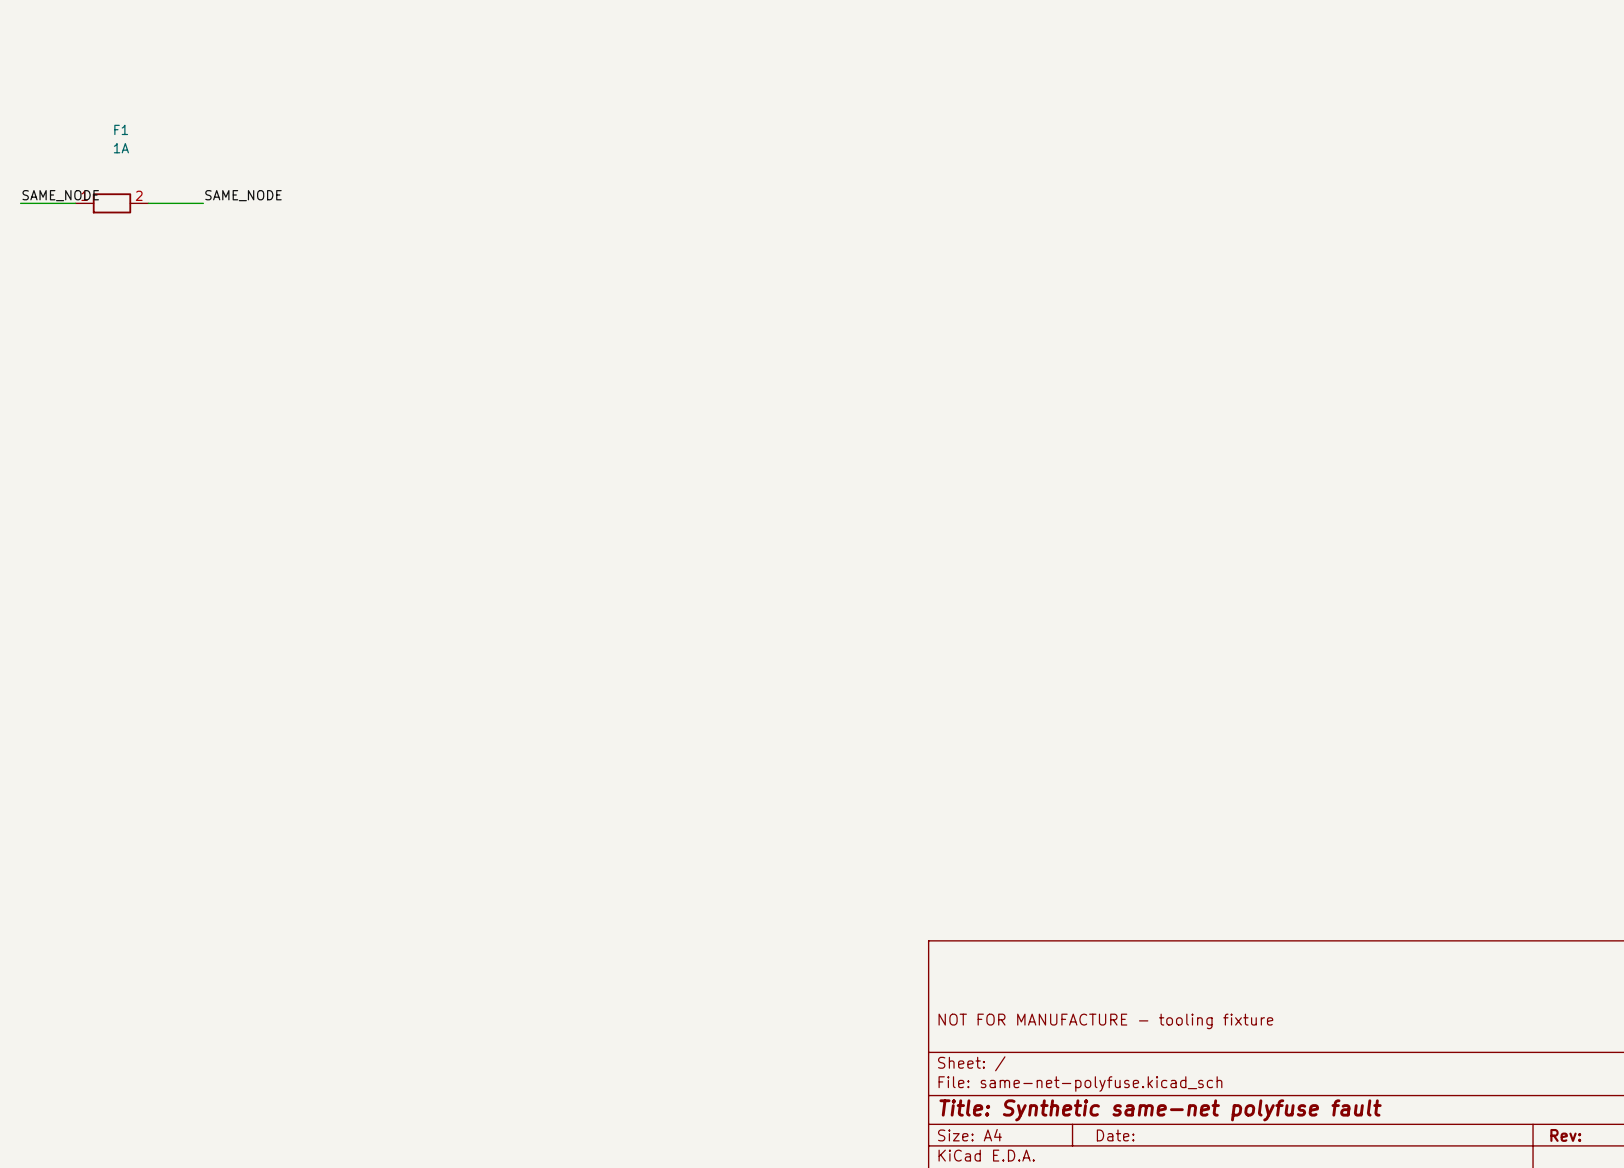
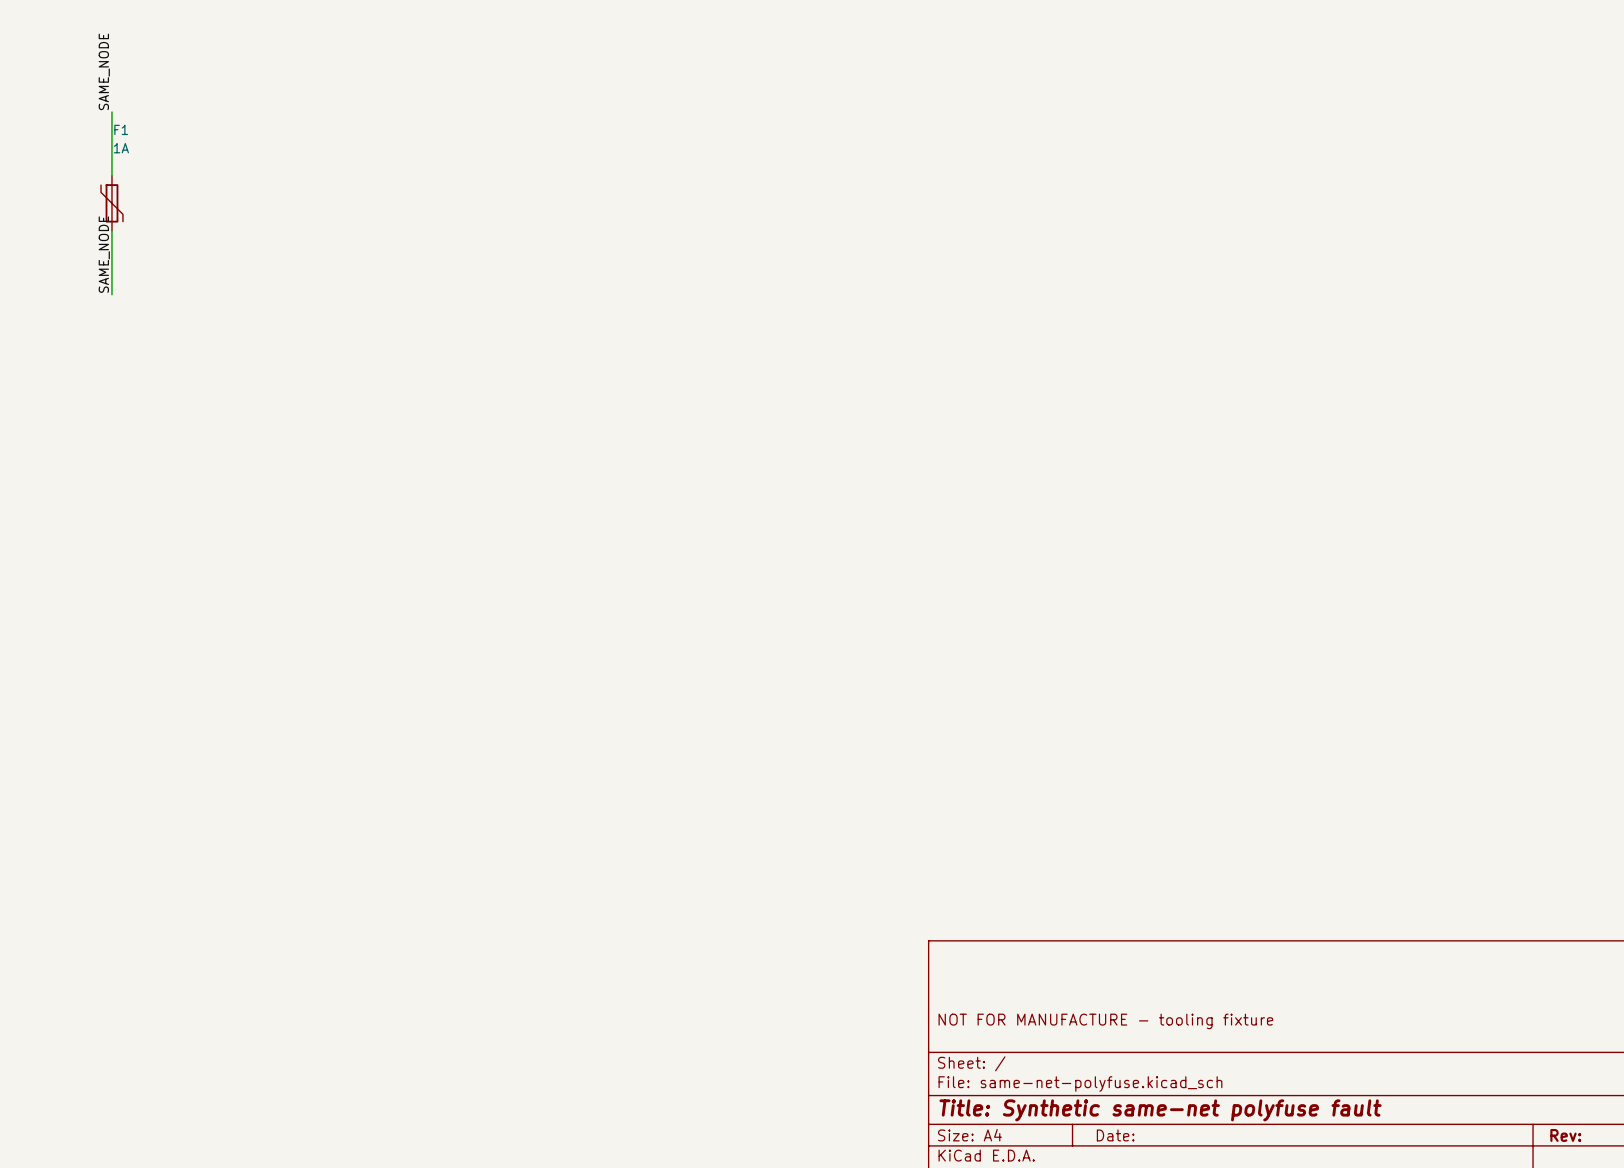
label: none -> SAME_NODE (104, 71)
wire: none -> (111, 111) (111, 175)
F1 symbol: [75, 193, 149, 214] -> [101, 175, 123, 231]
label rotation: 0° (60, 195) -> 90° counterclockwise (104, 254)
label: SAME_NODE (243, 195) -> none
wire: (20, 203) (75, 203) -> none
wire: (148, 203) (203, 203) -> none
wire: none -> (111, 230) (111, 294)

